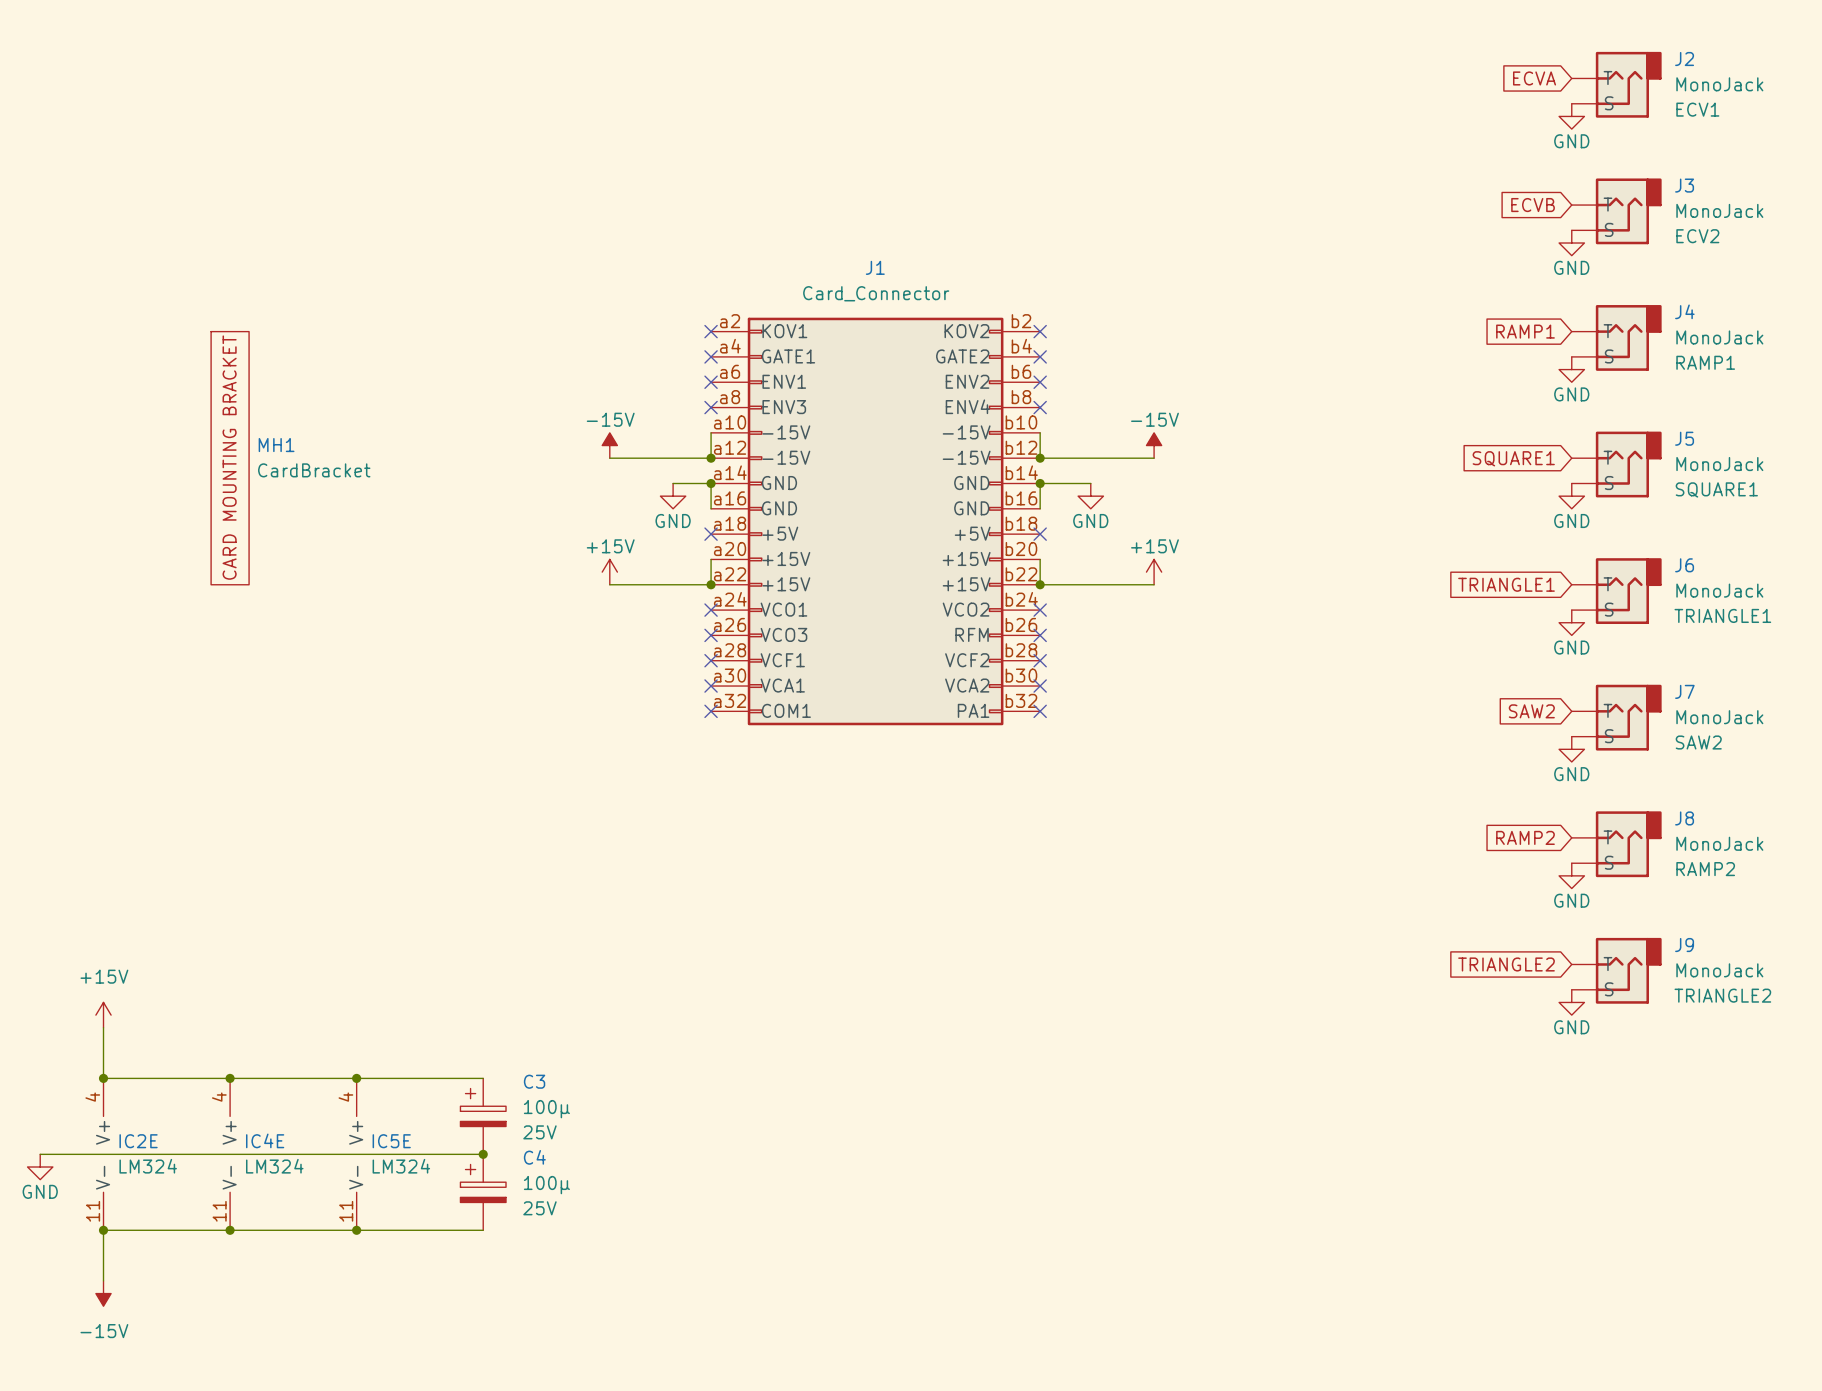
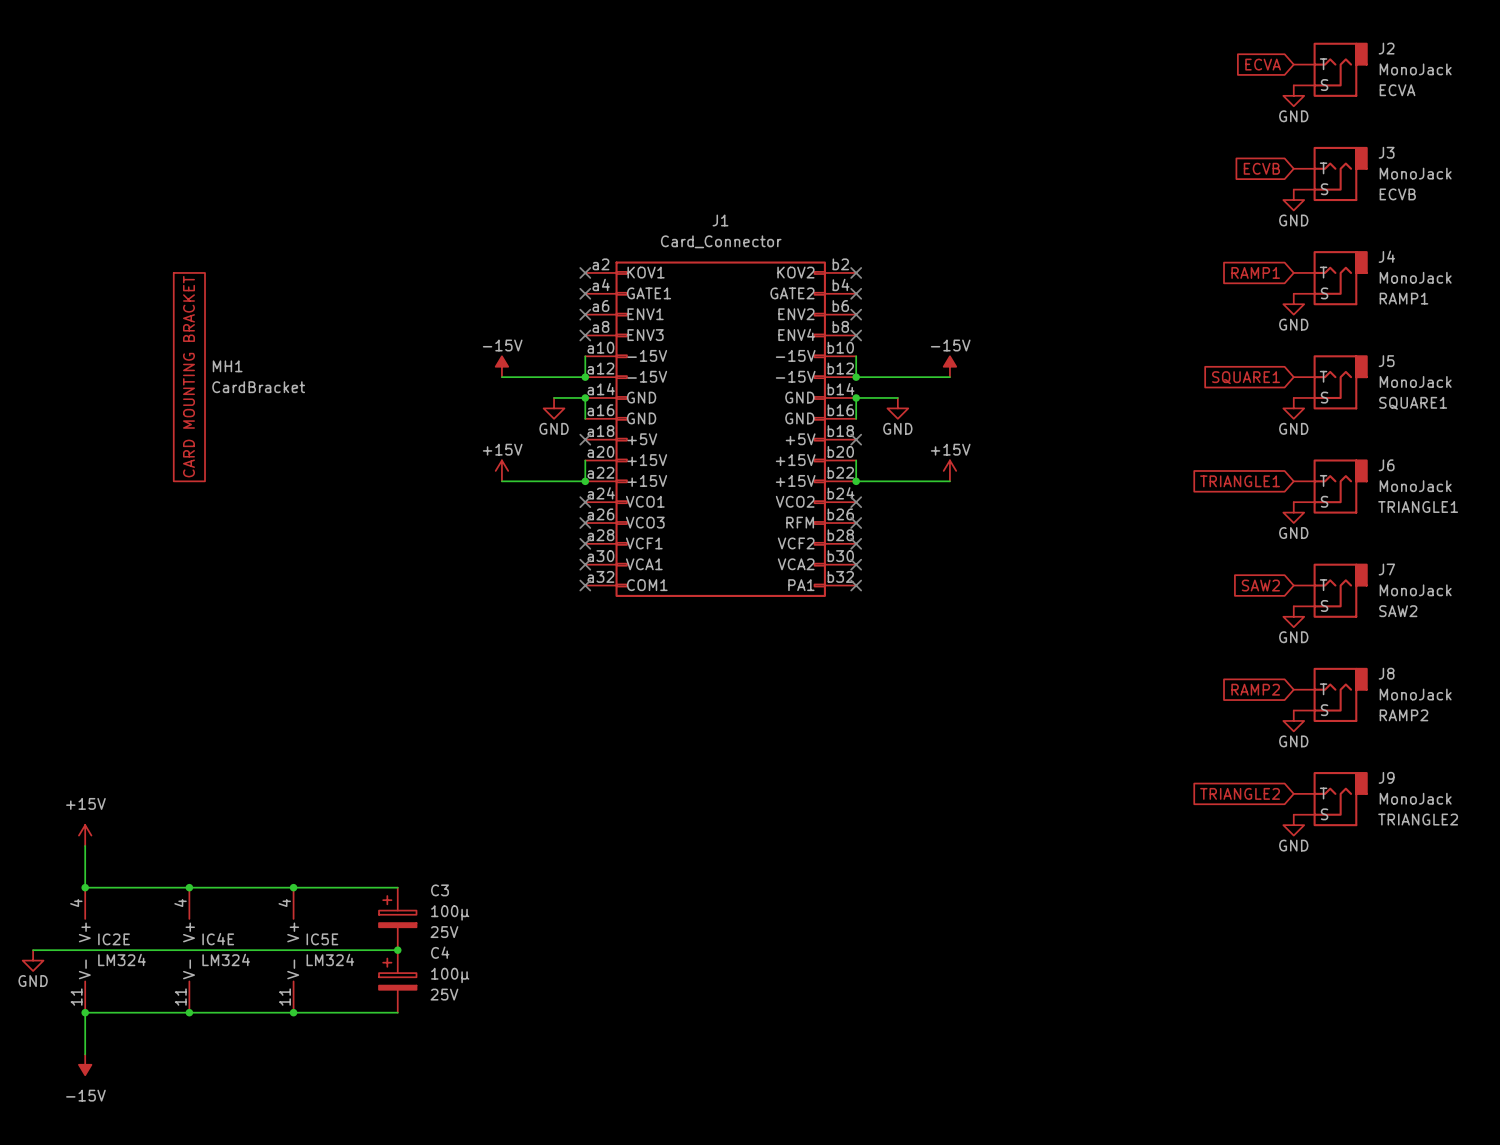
J2 text: ECV1 (1697, 109) -> ECVA (1397, 90)
J3 text: ECV2 (1697, 236) -> ECVB (1397, 194)

